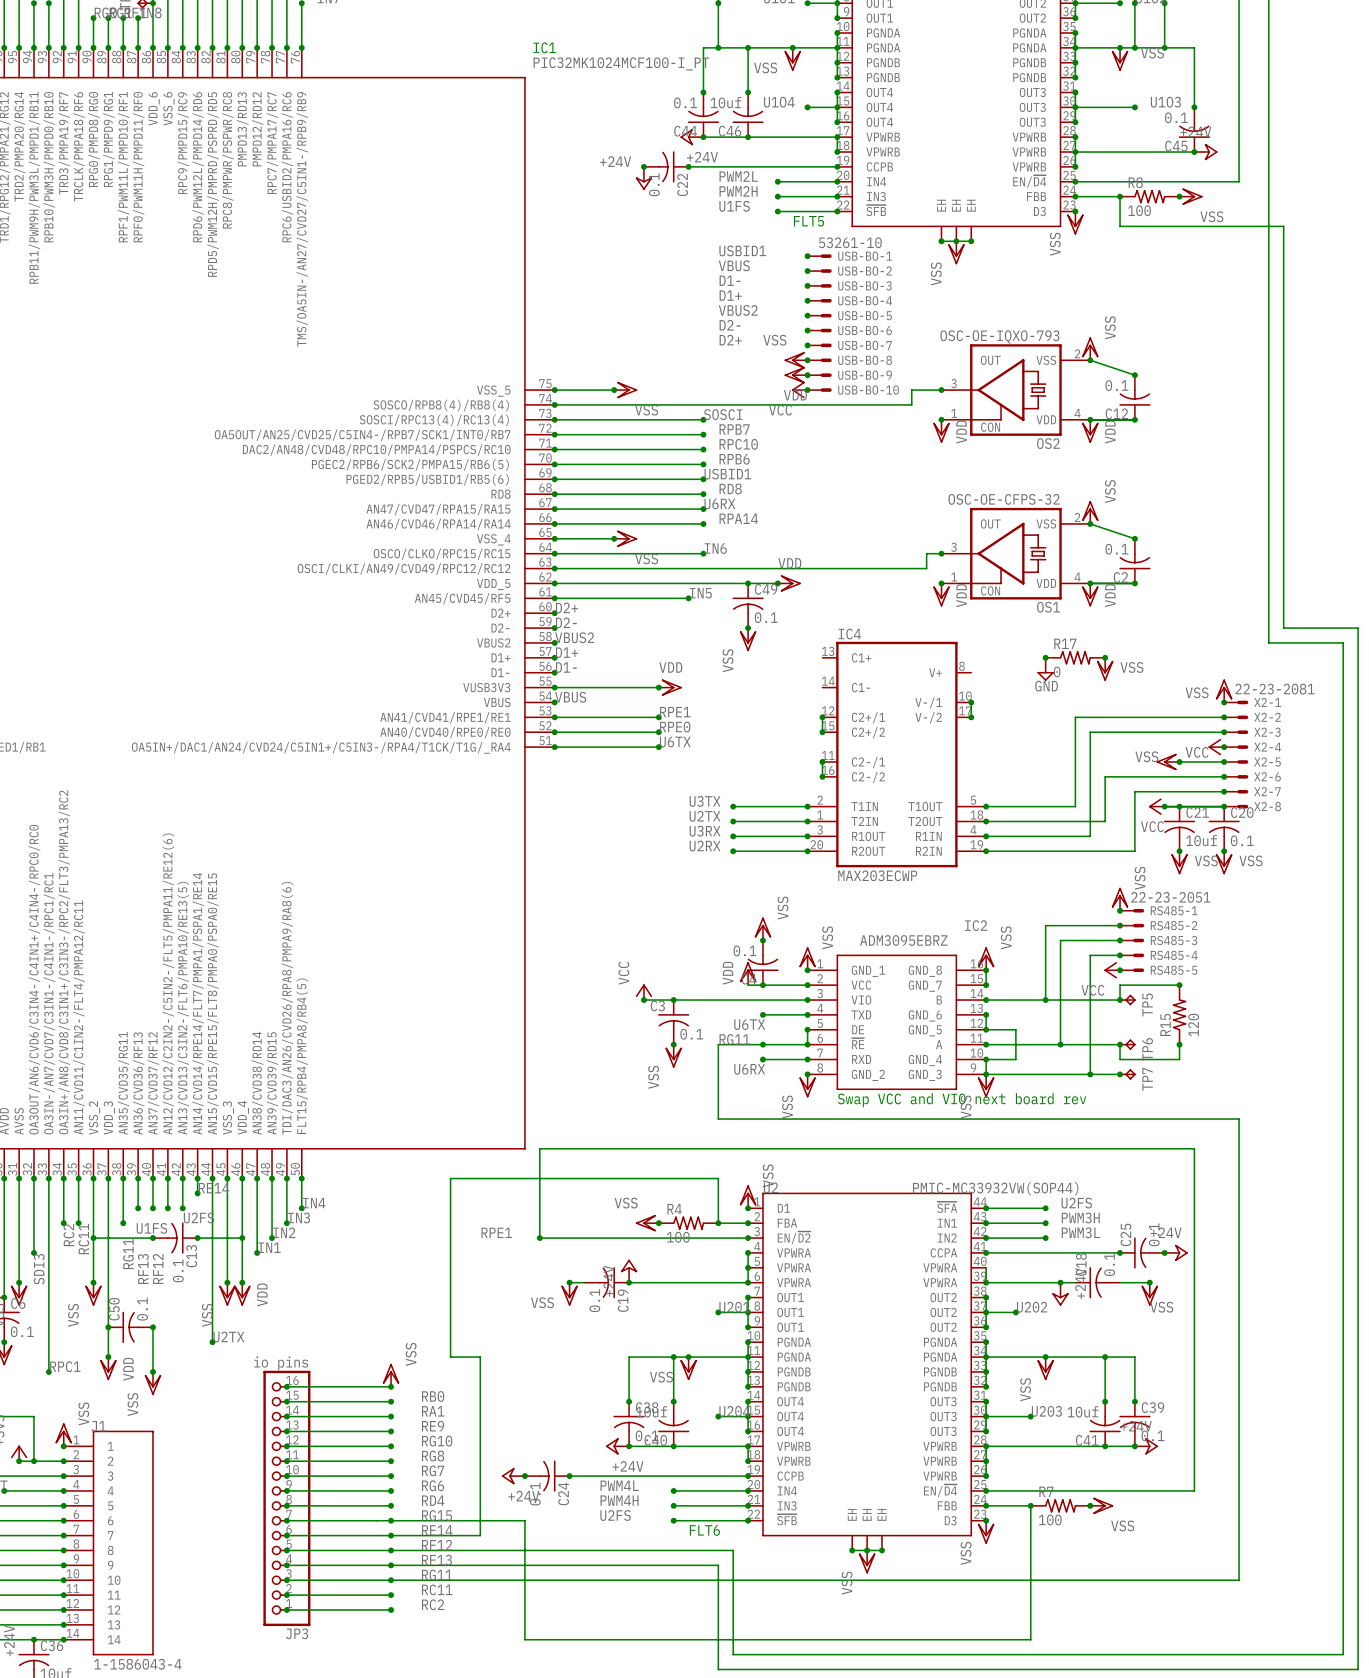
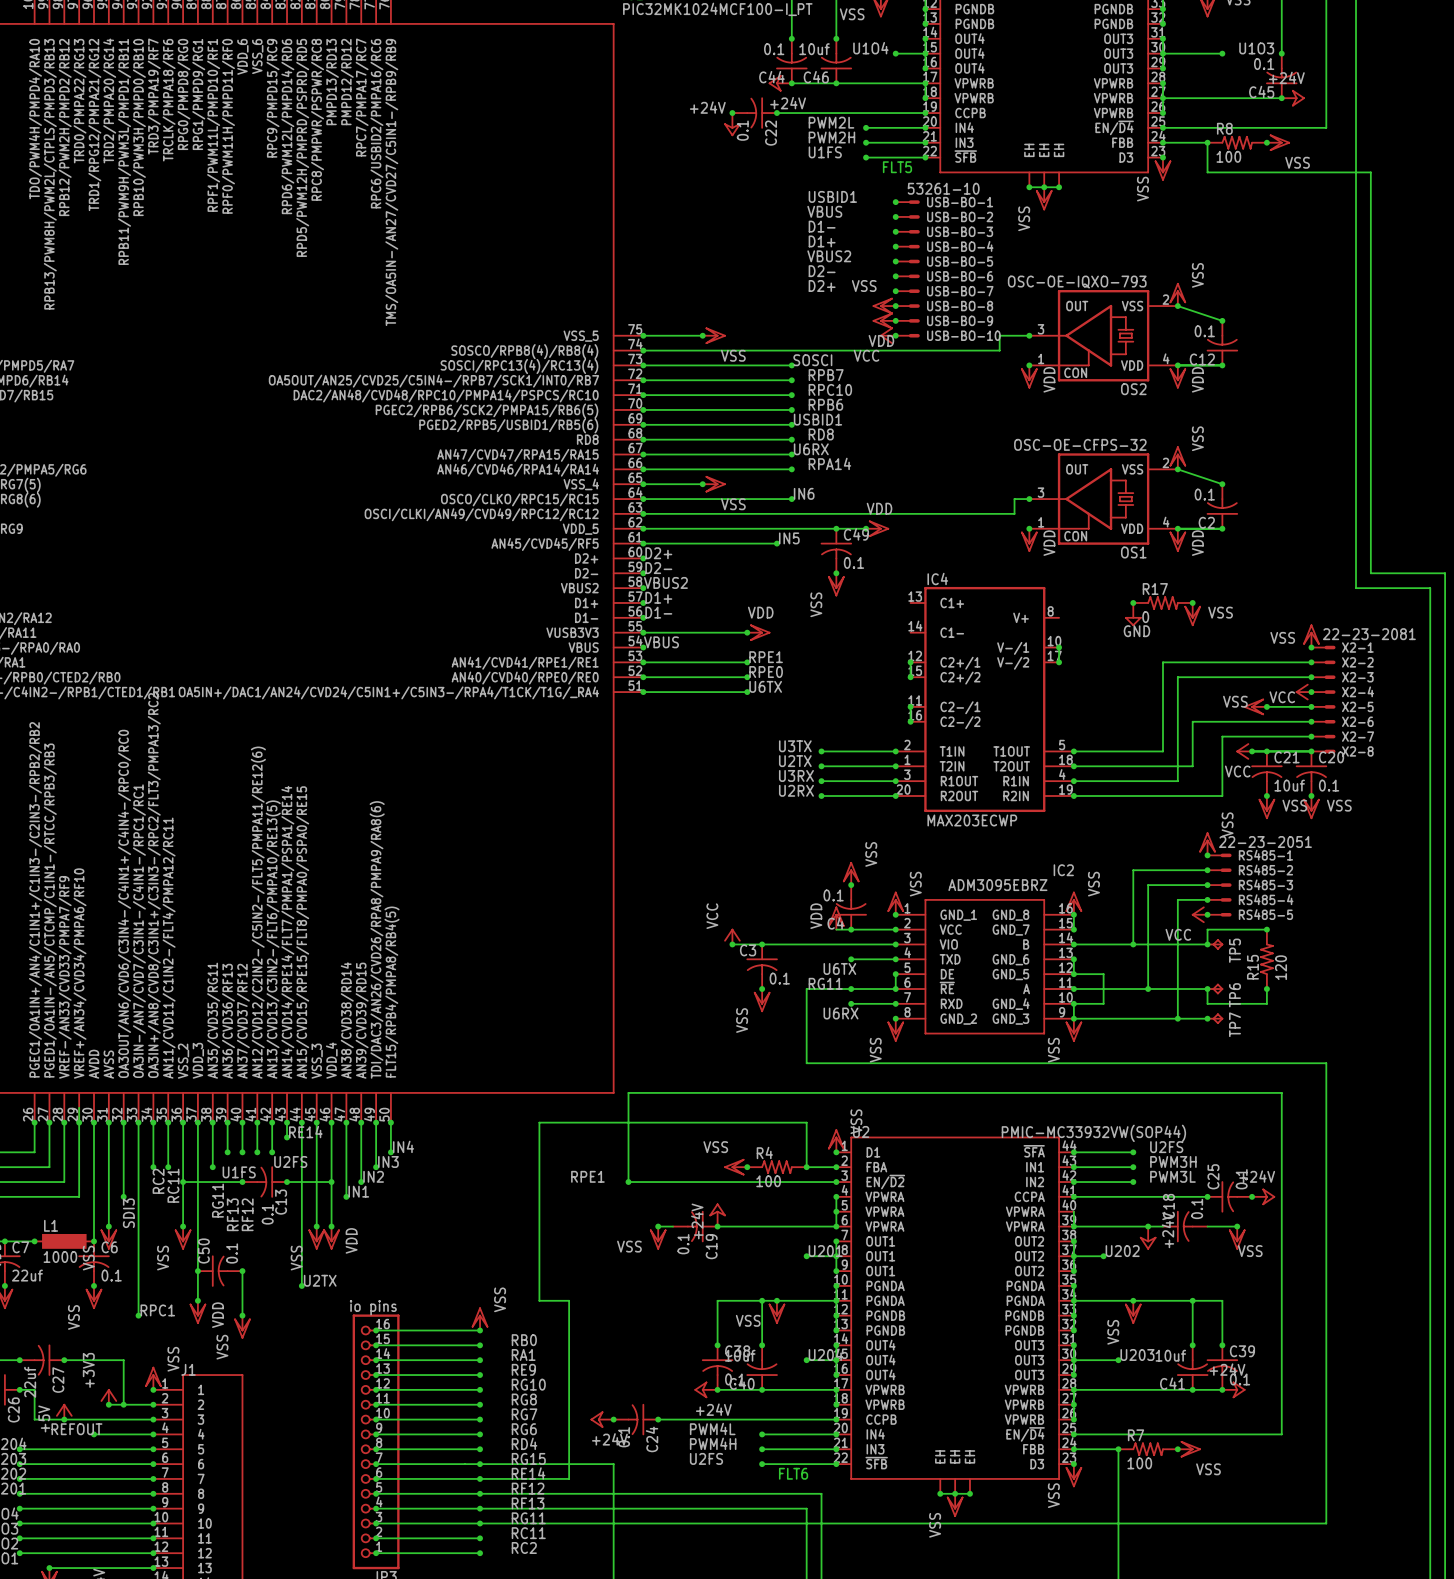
text: Swap VCC and VIO next board rev (962, 1100) -> none

